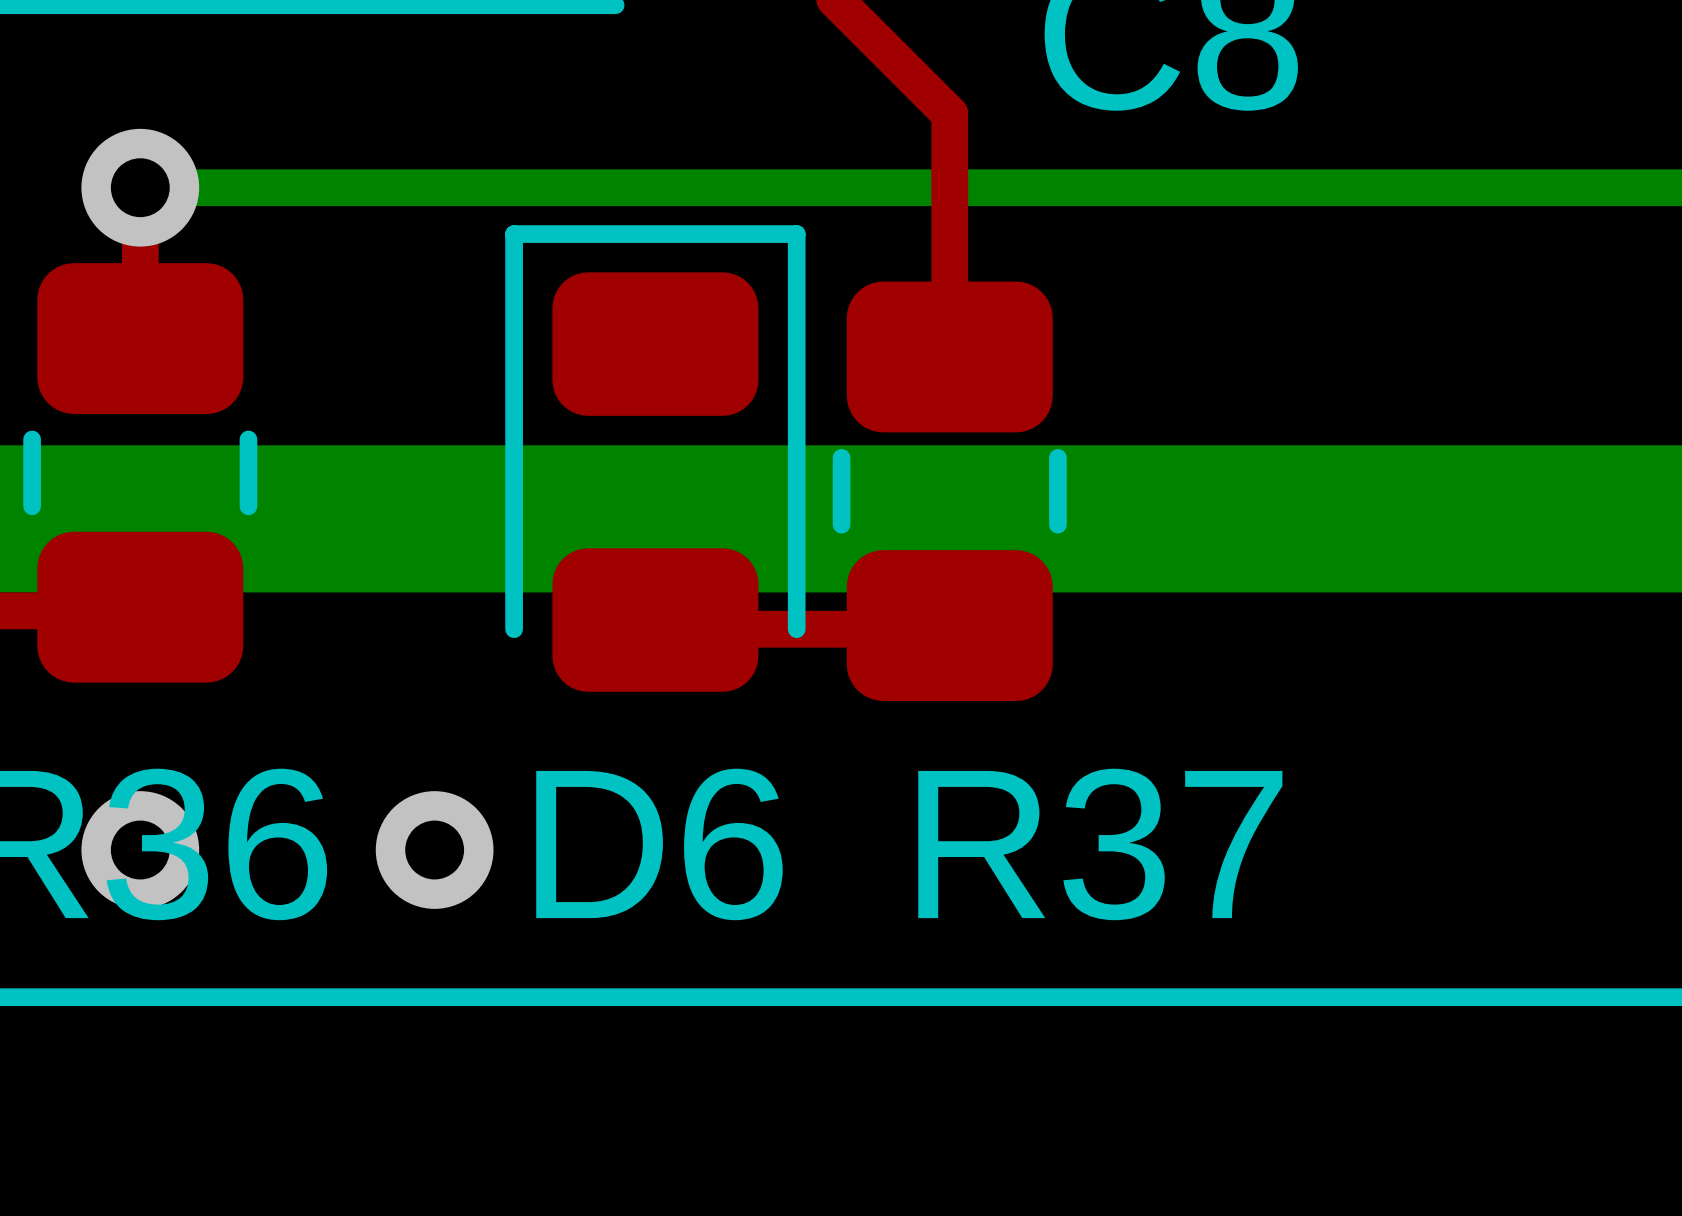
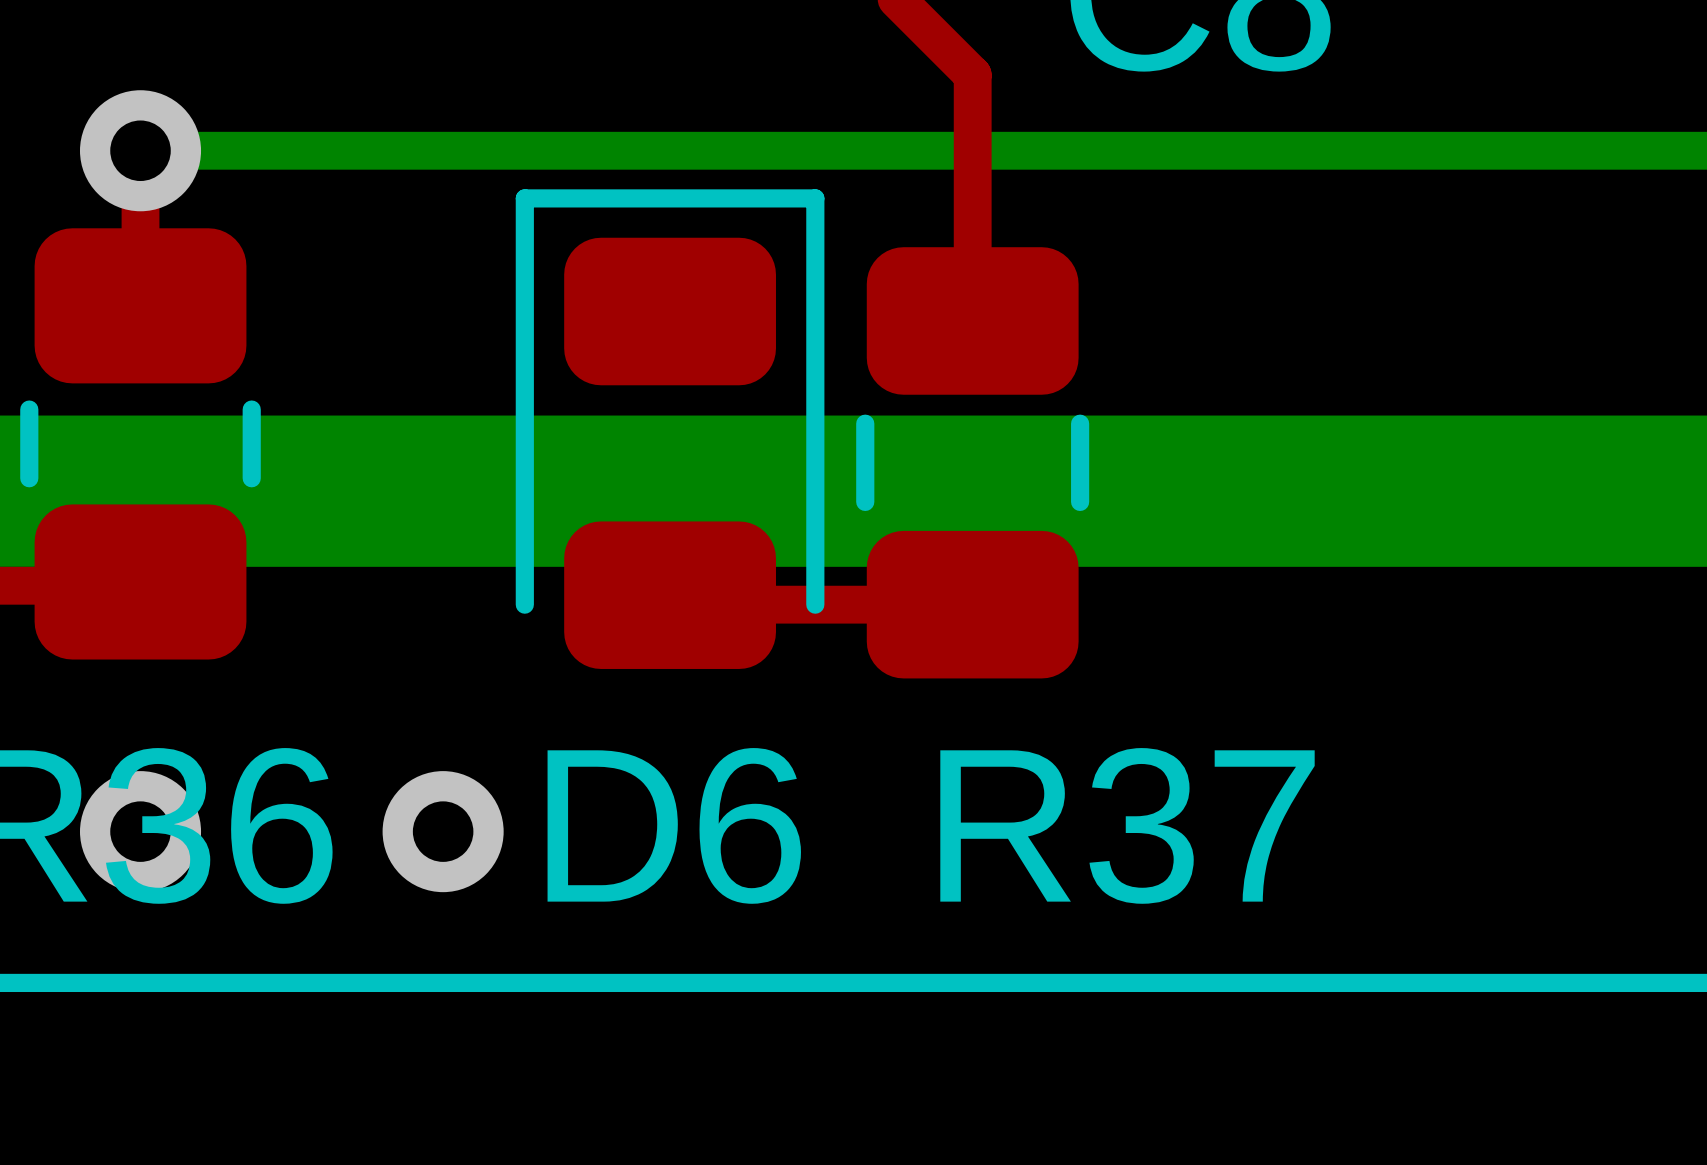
R37 footprint: [832, 281, 1067, 701] -> [856, 247, 1090, 679]

